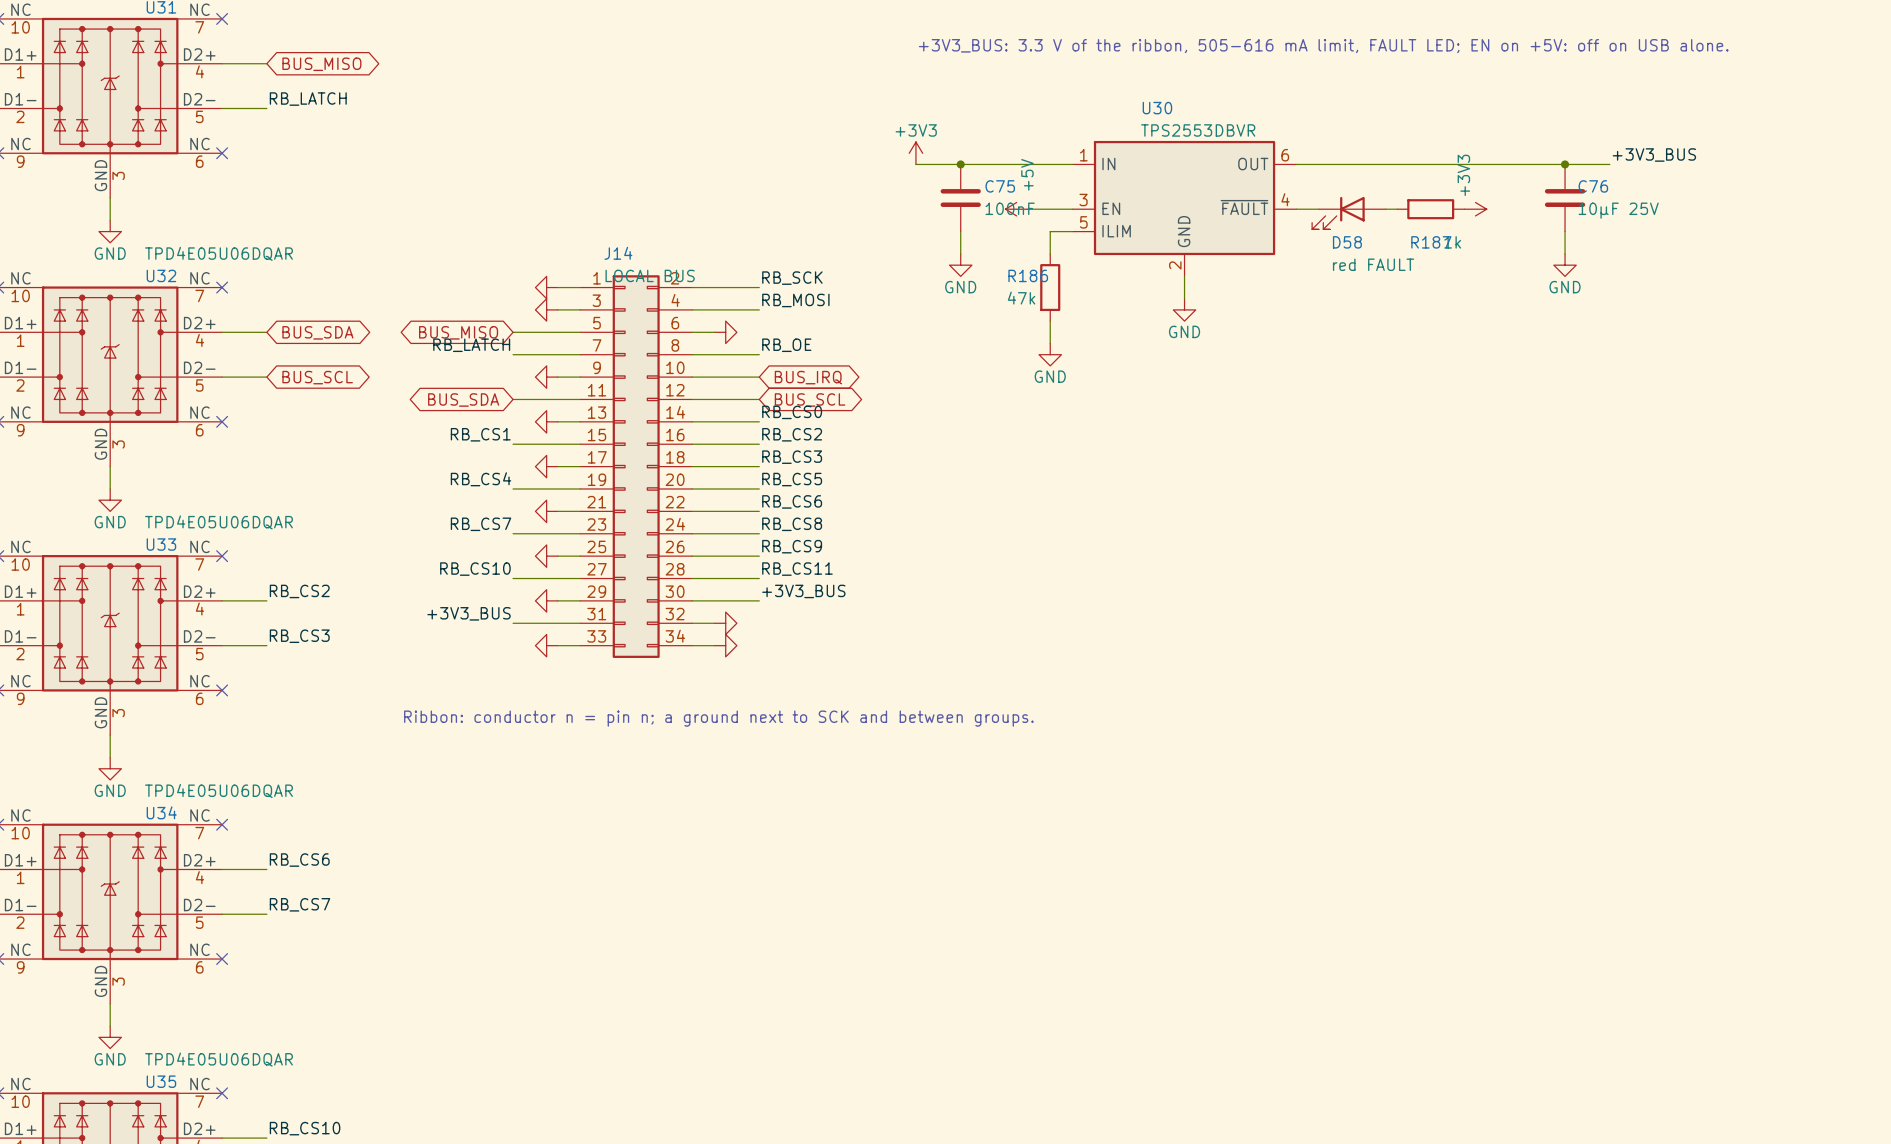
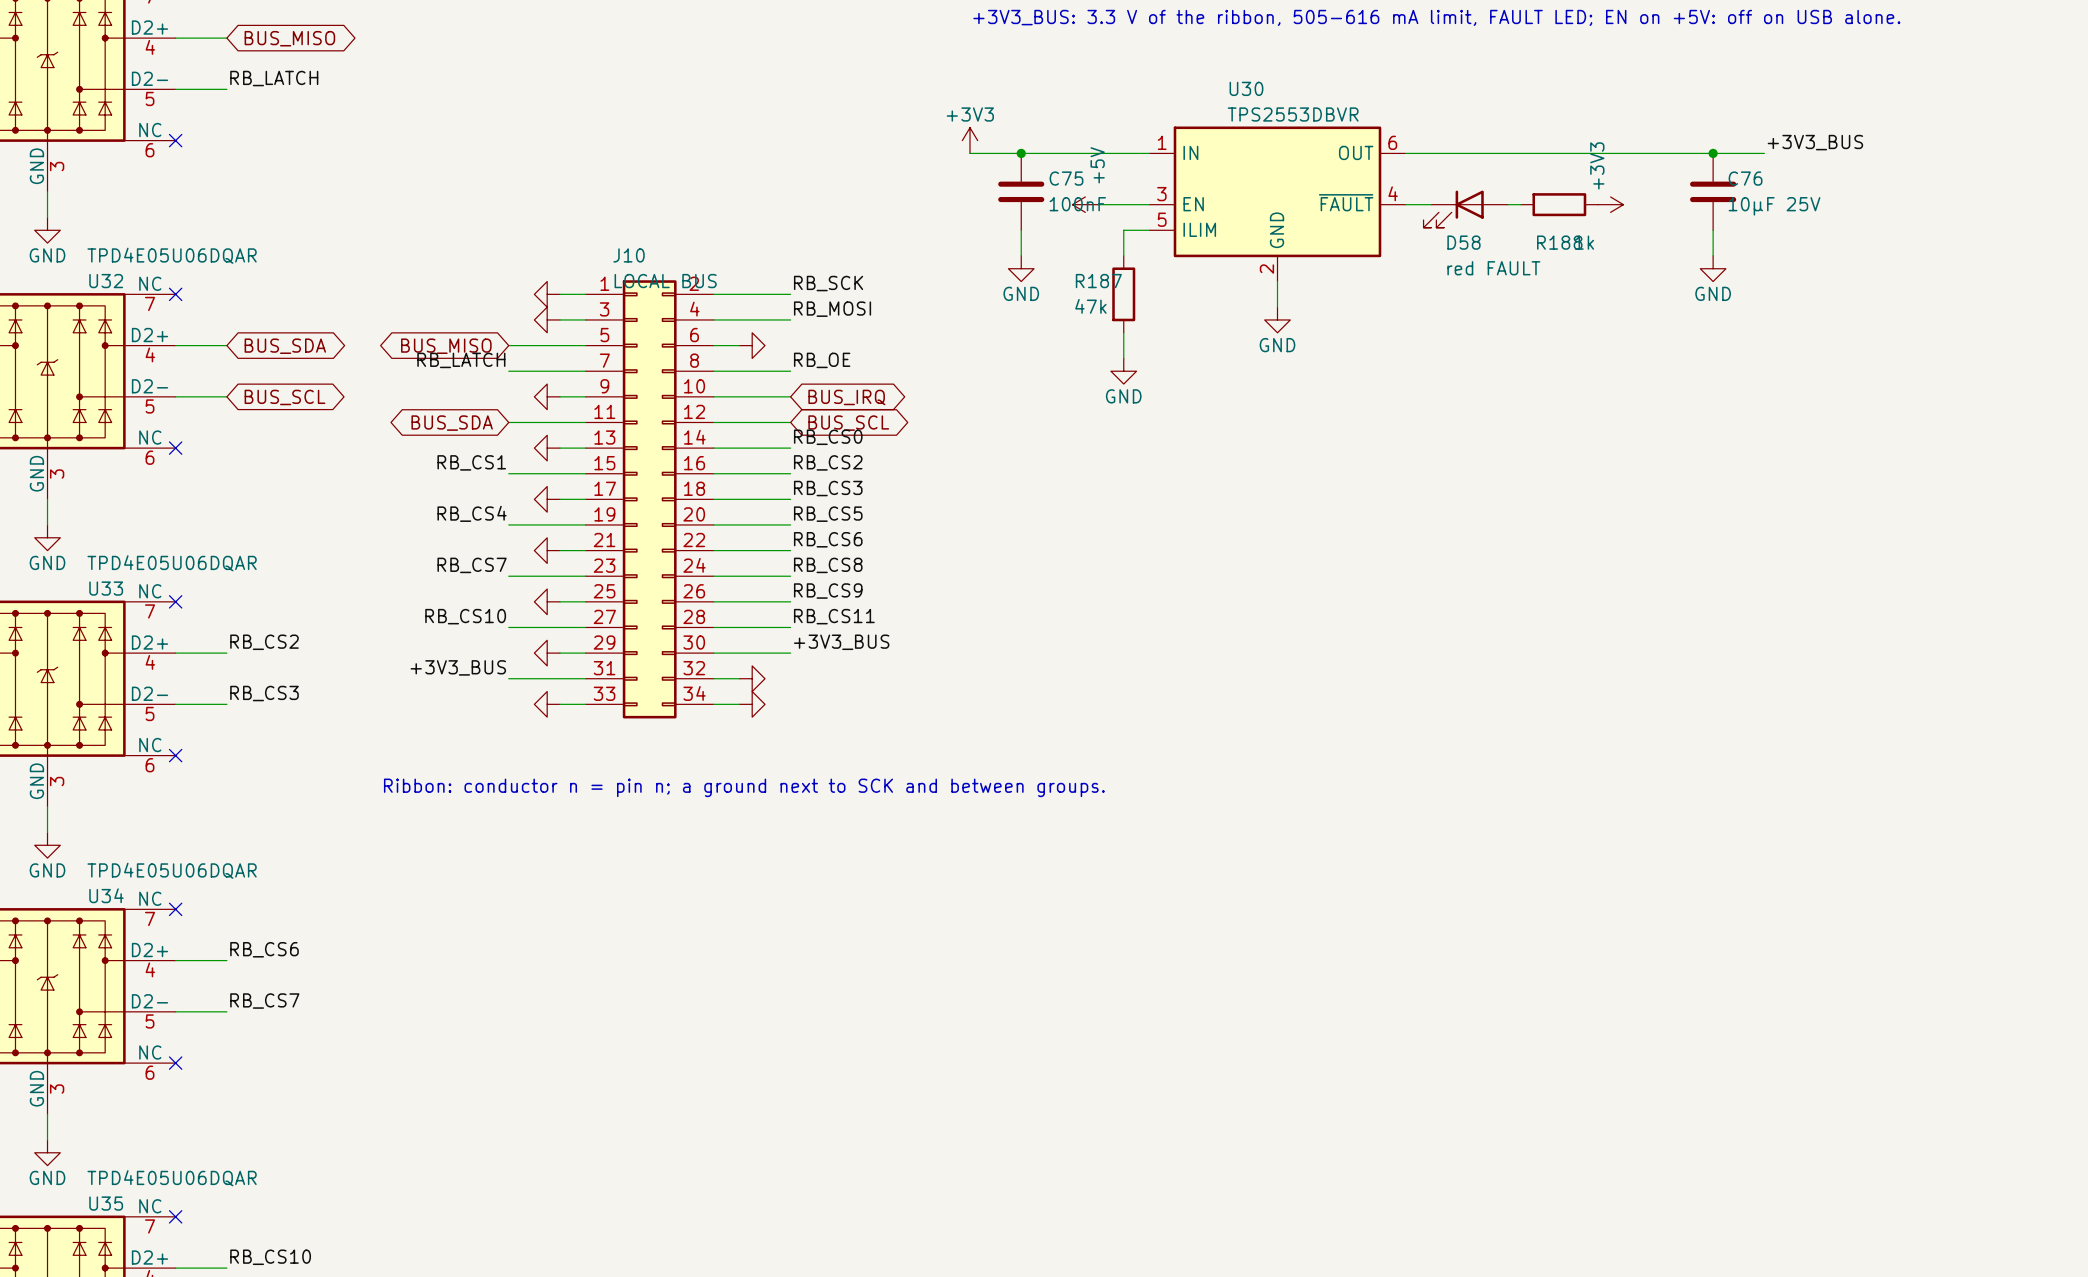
R187 name: R187 (1431, 242) -> R188 (1559, 242)
J14 name: J14 (618, 253) -> J10 (629, 255)
R186 name: R186 (1028, 275) -> R187 (1098, 281)

